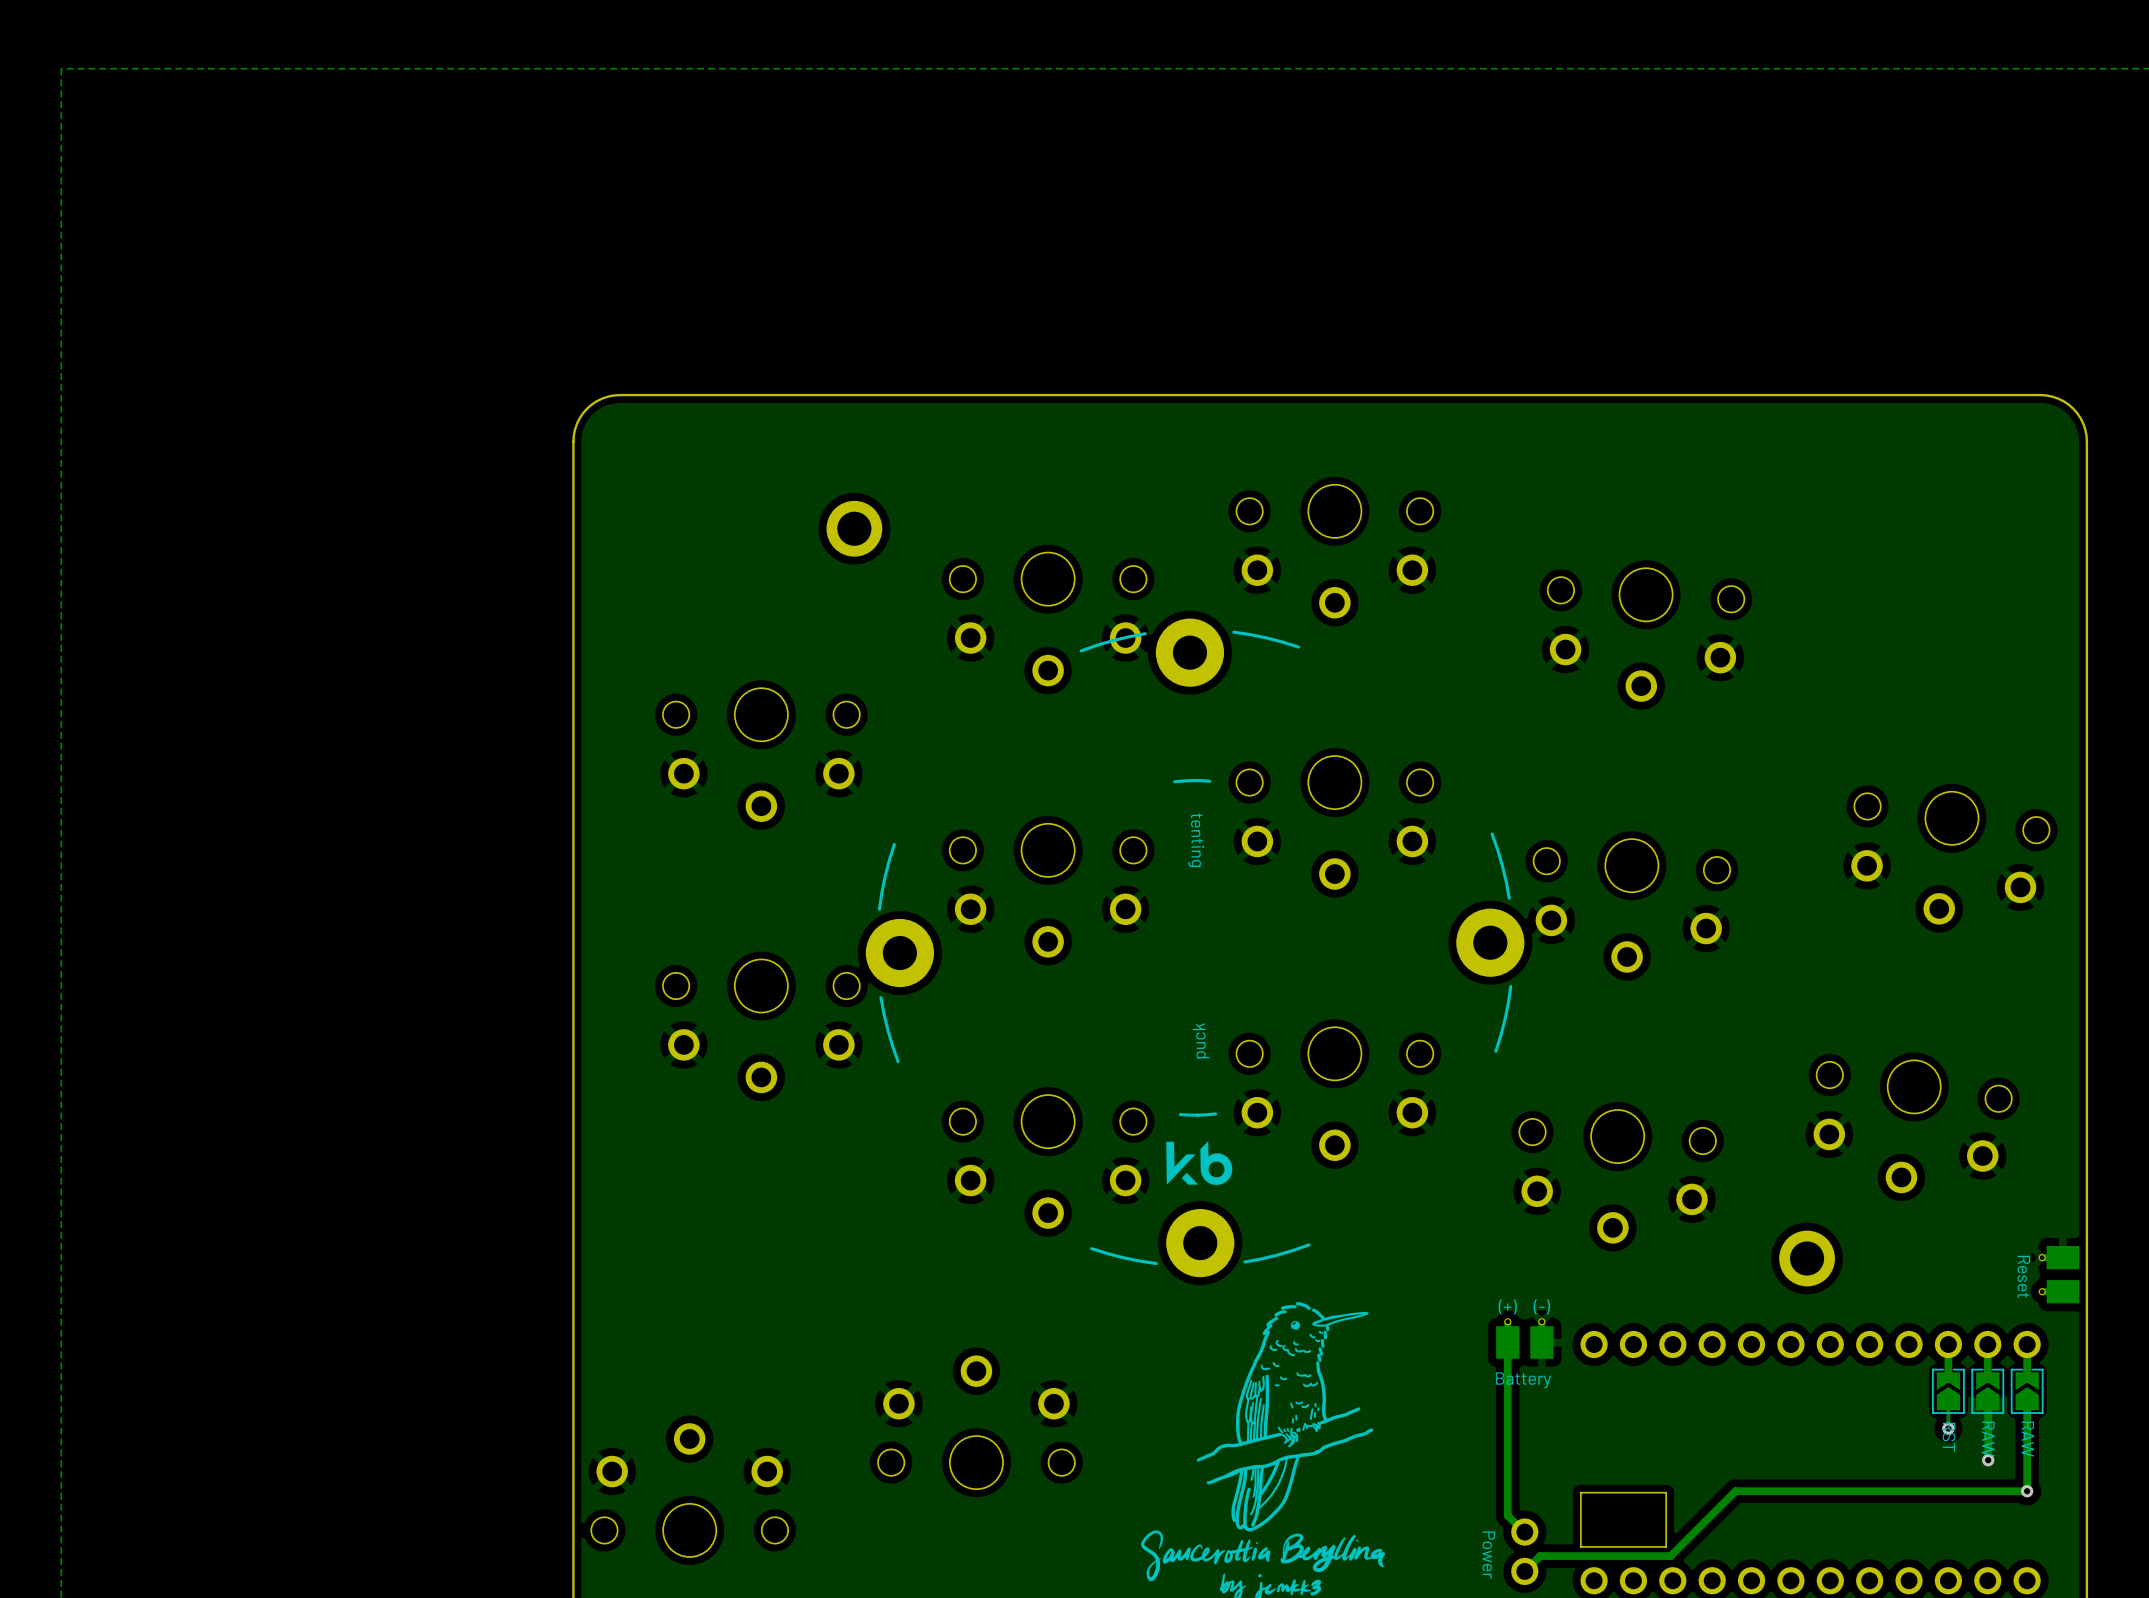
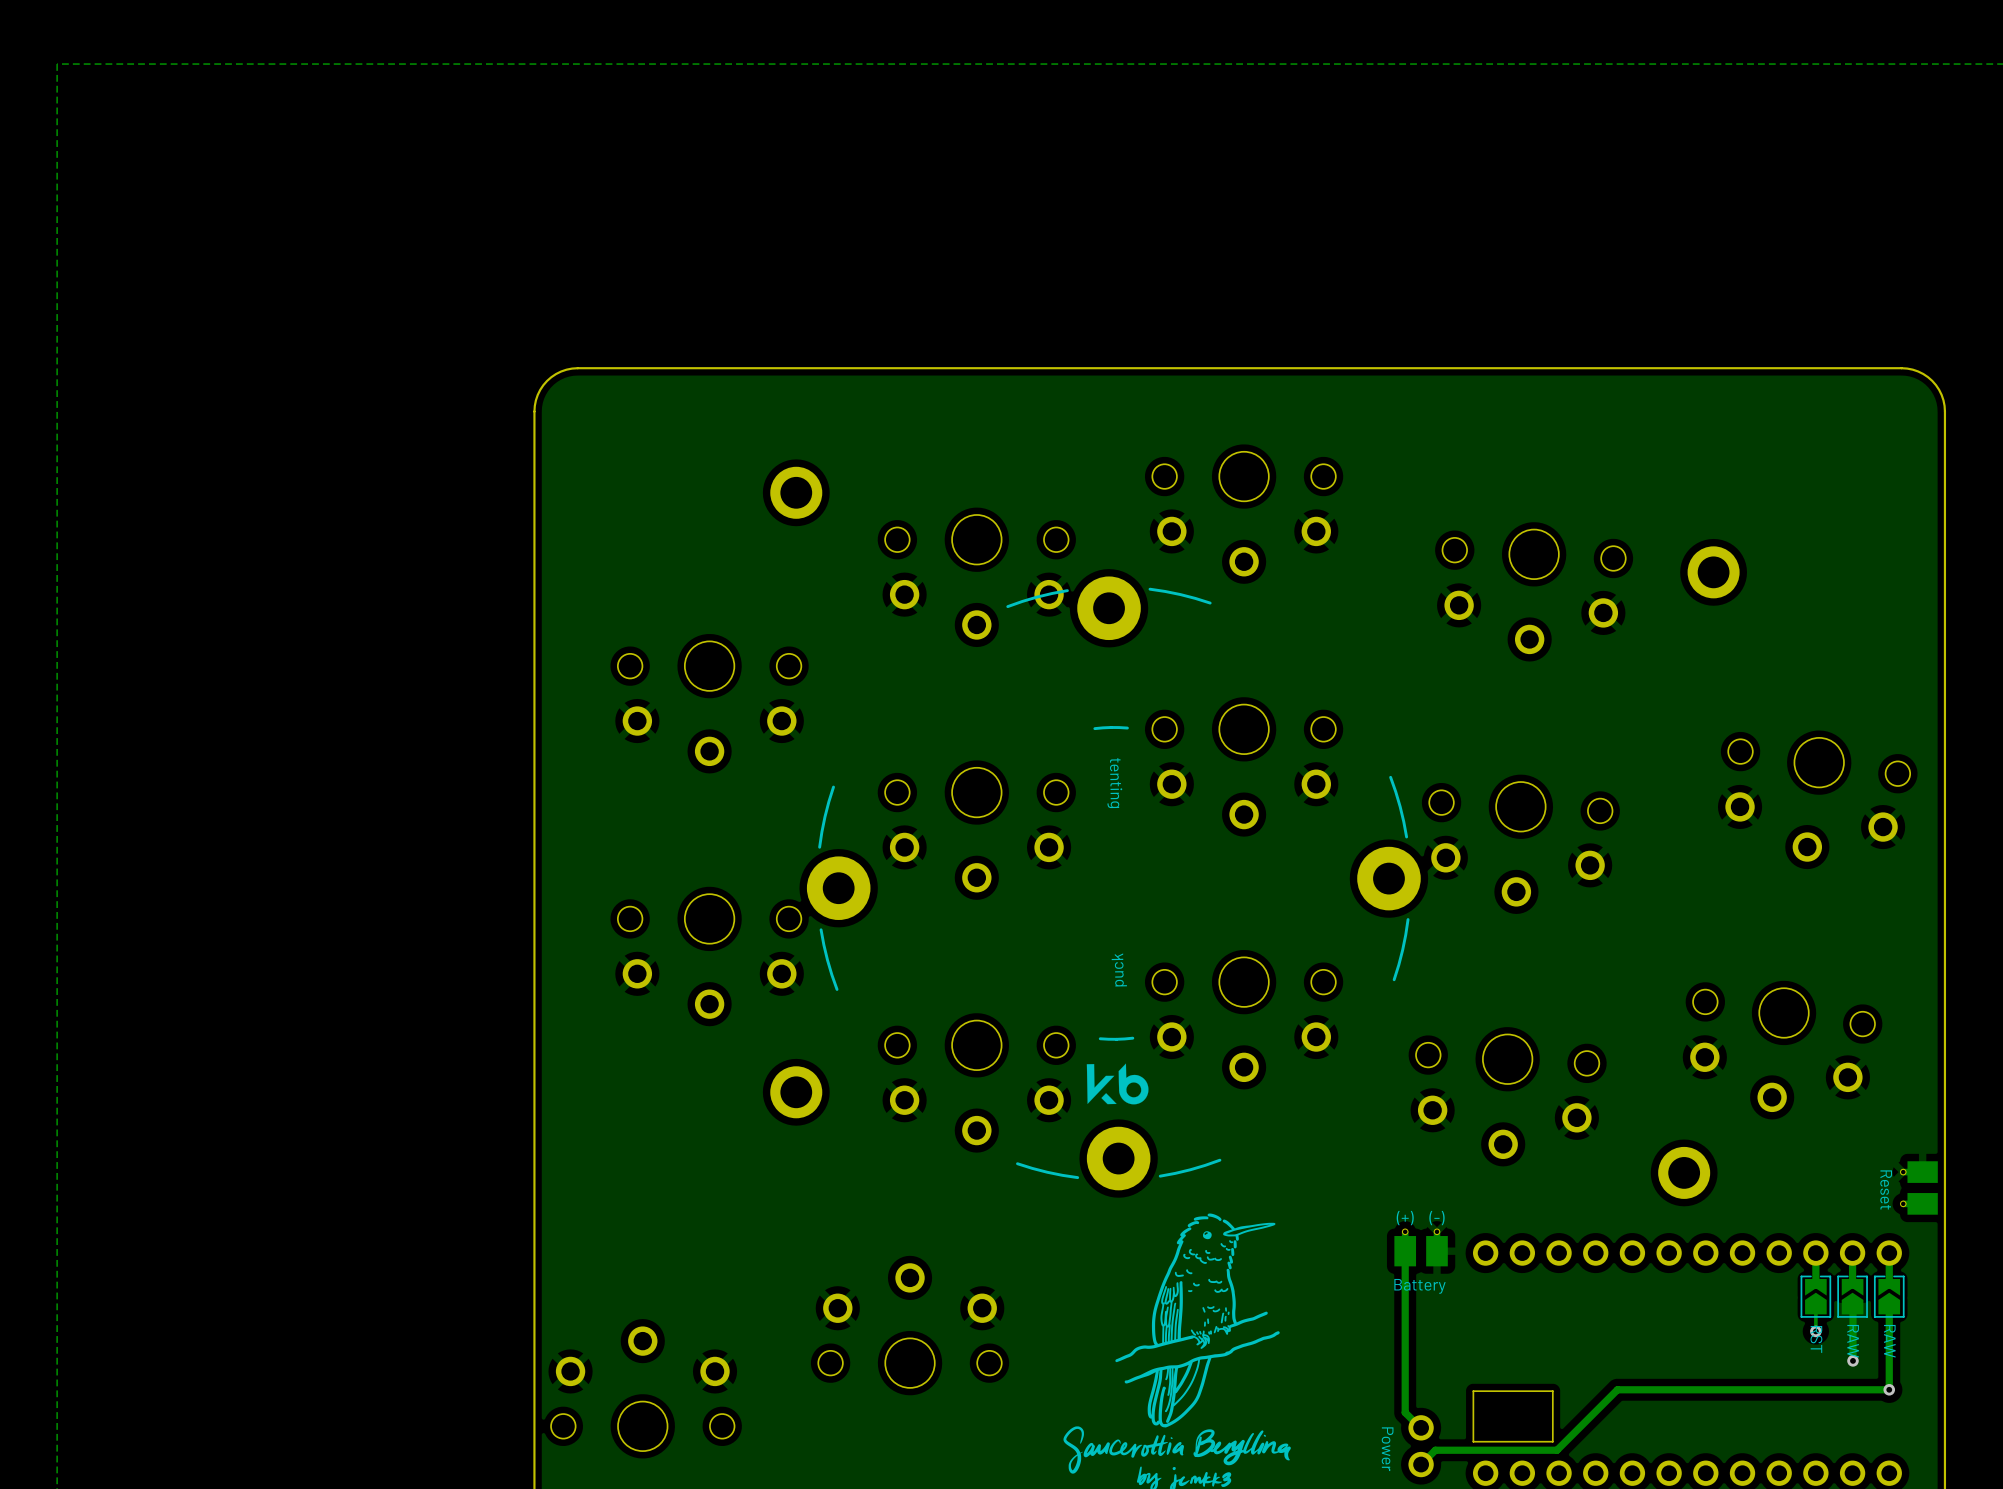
part: none -> (1713, 572)
part: none -> (796, 1092)

